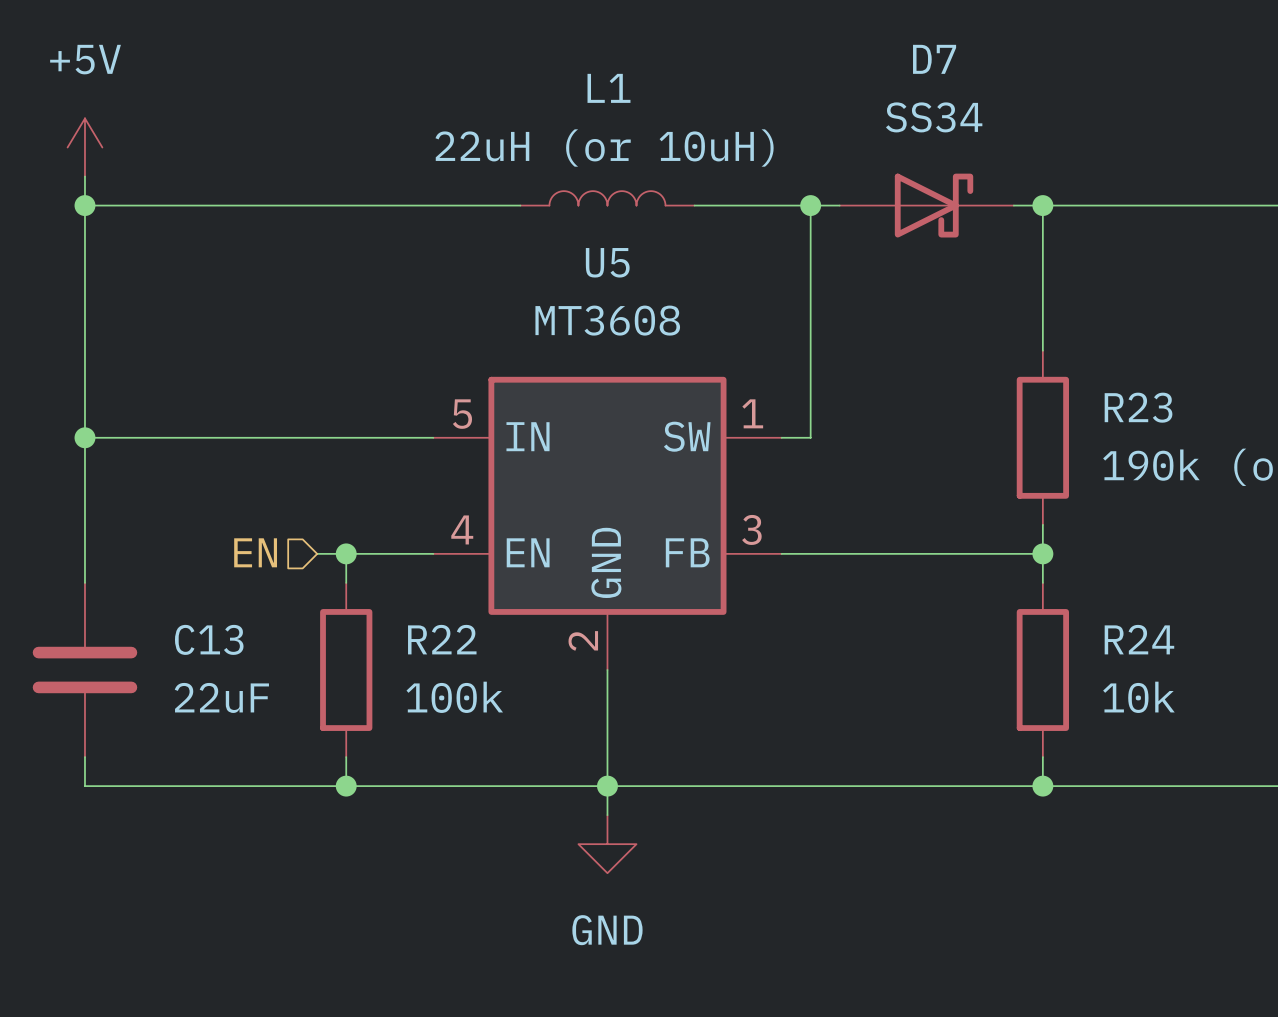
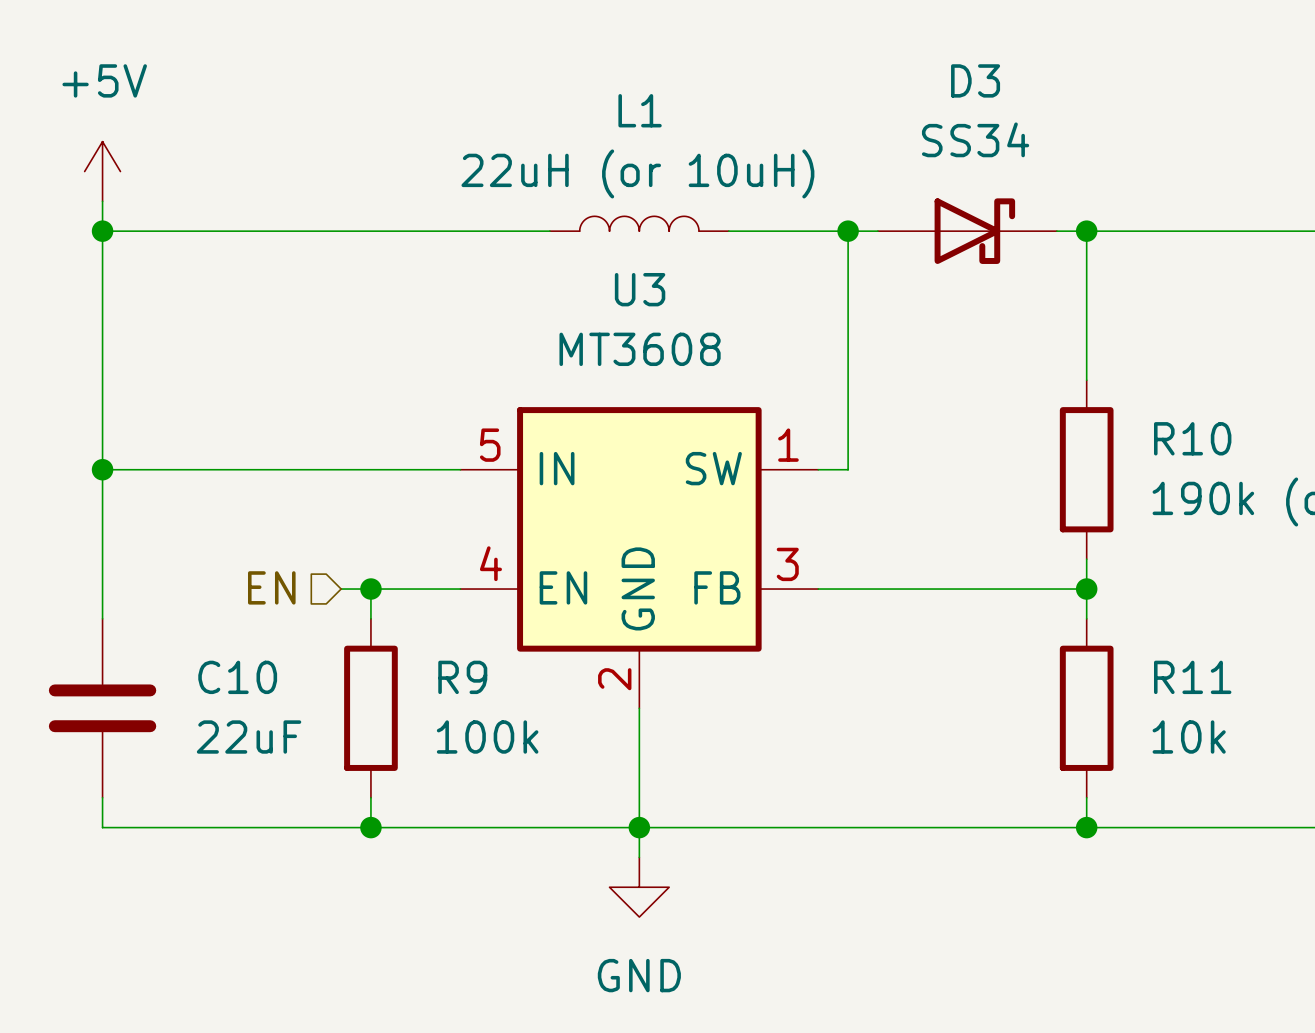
D7 name: D7 (934, 59) -> D3 (975, 80)
U5 name: U5 (607, 262) -> U3 (640, 289)
R23 name: R23 (1138, 407) -> R10 (1192, 438)
C13 name: C13 (209, 639) -> C10 (237, 677)
R22 name: R22 (442, 639) -> R9 (462, 677)
R24 name: R24 (1139, 639) -> R11 (1192, 677)

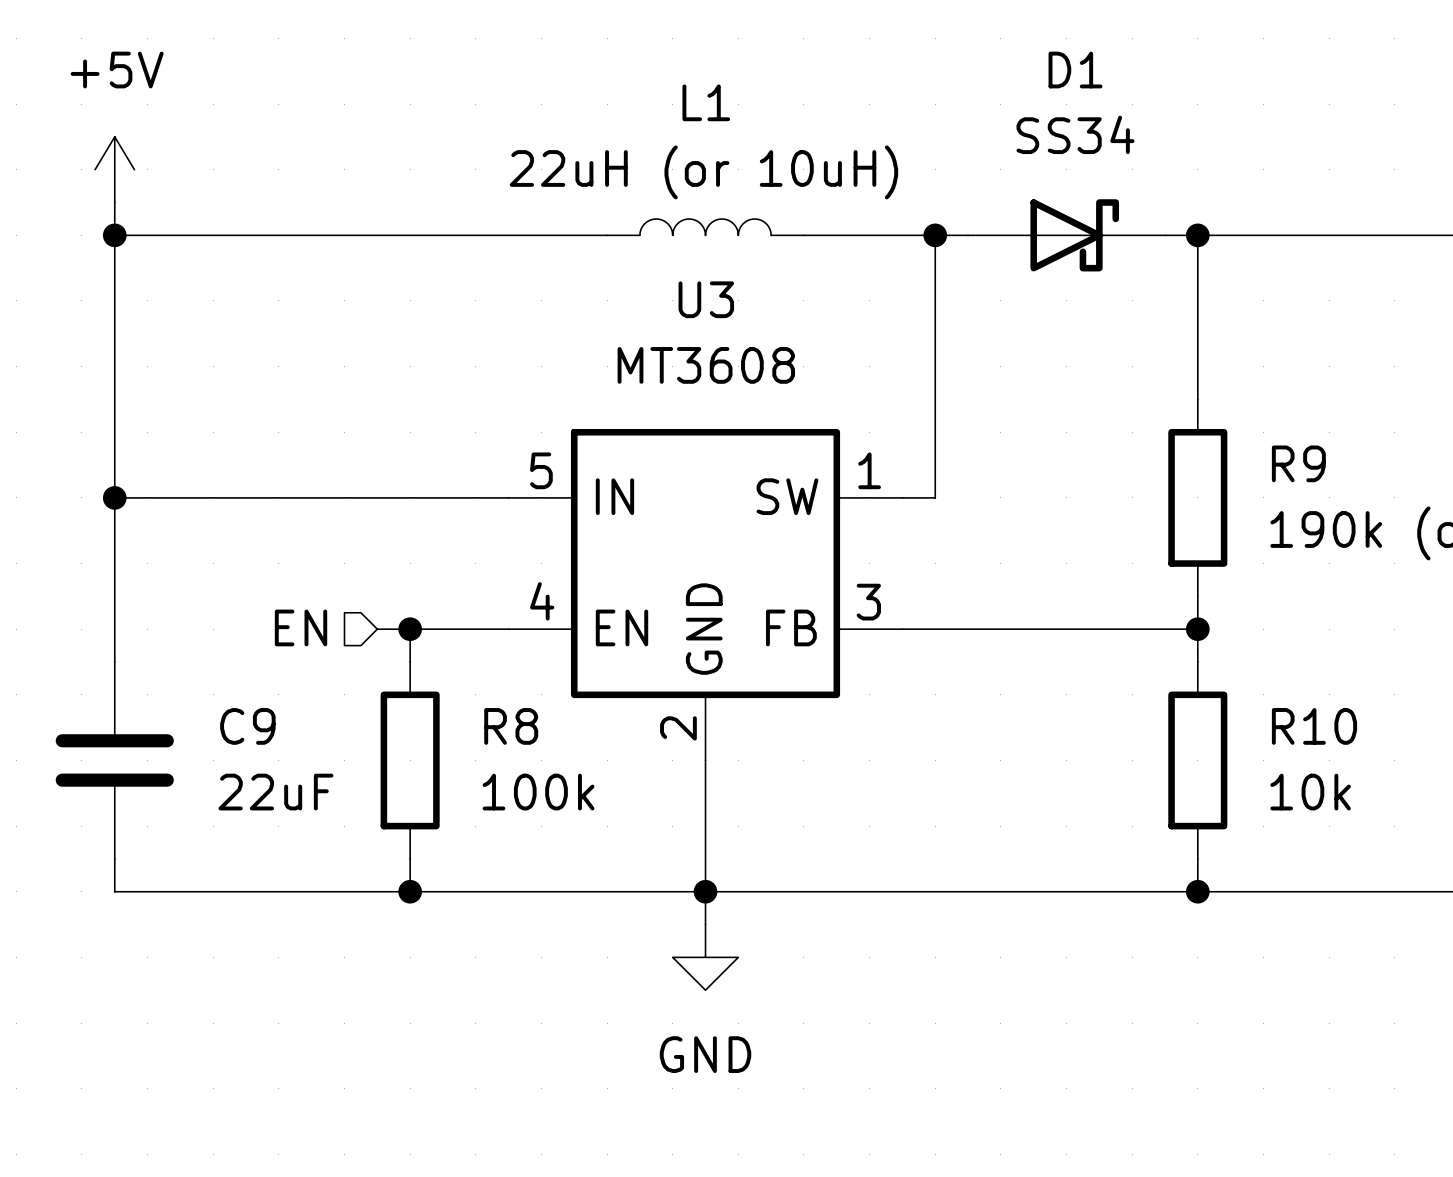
D3 name: D3 (975, 80) -> D1 (1075, 70)
R10 name: R10 (1192, 438) -> R9 (1298, 463)
C10 name: C10 (237, 677) -> C9 (247, 726)
R9 name: R9 (462, 677) -> R8 (511, 726)
R11 name: R11 (1192, 677) -> R10 (1314, 726)

